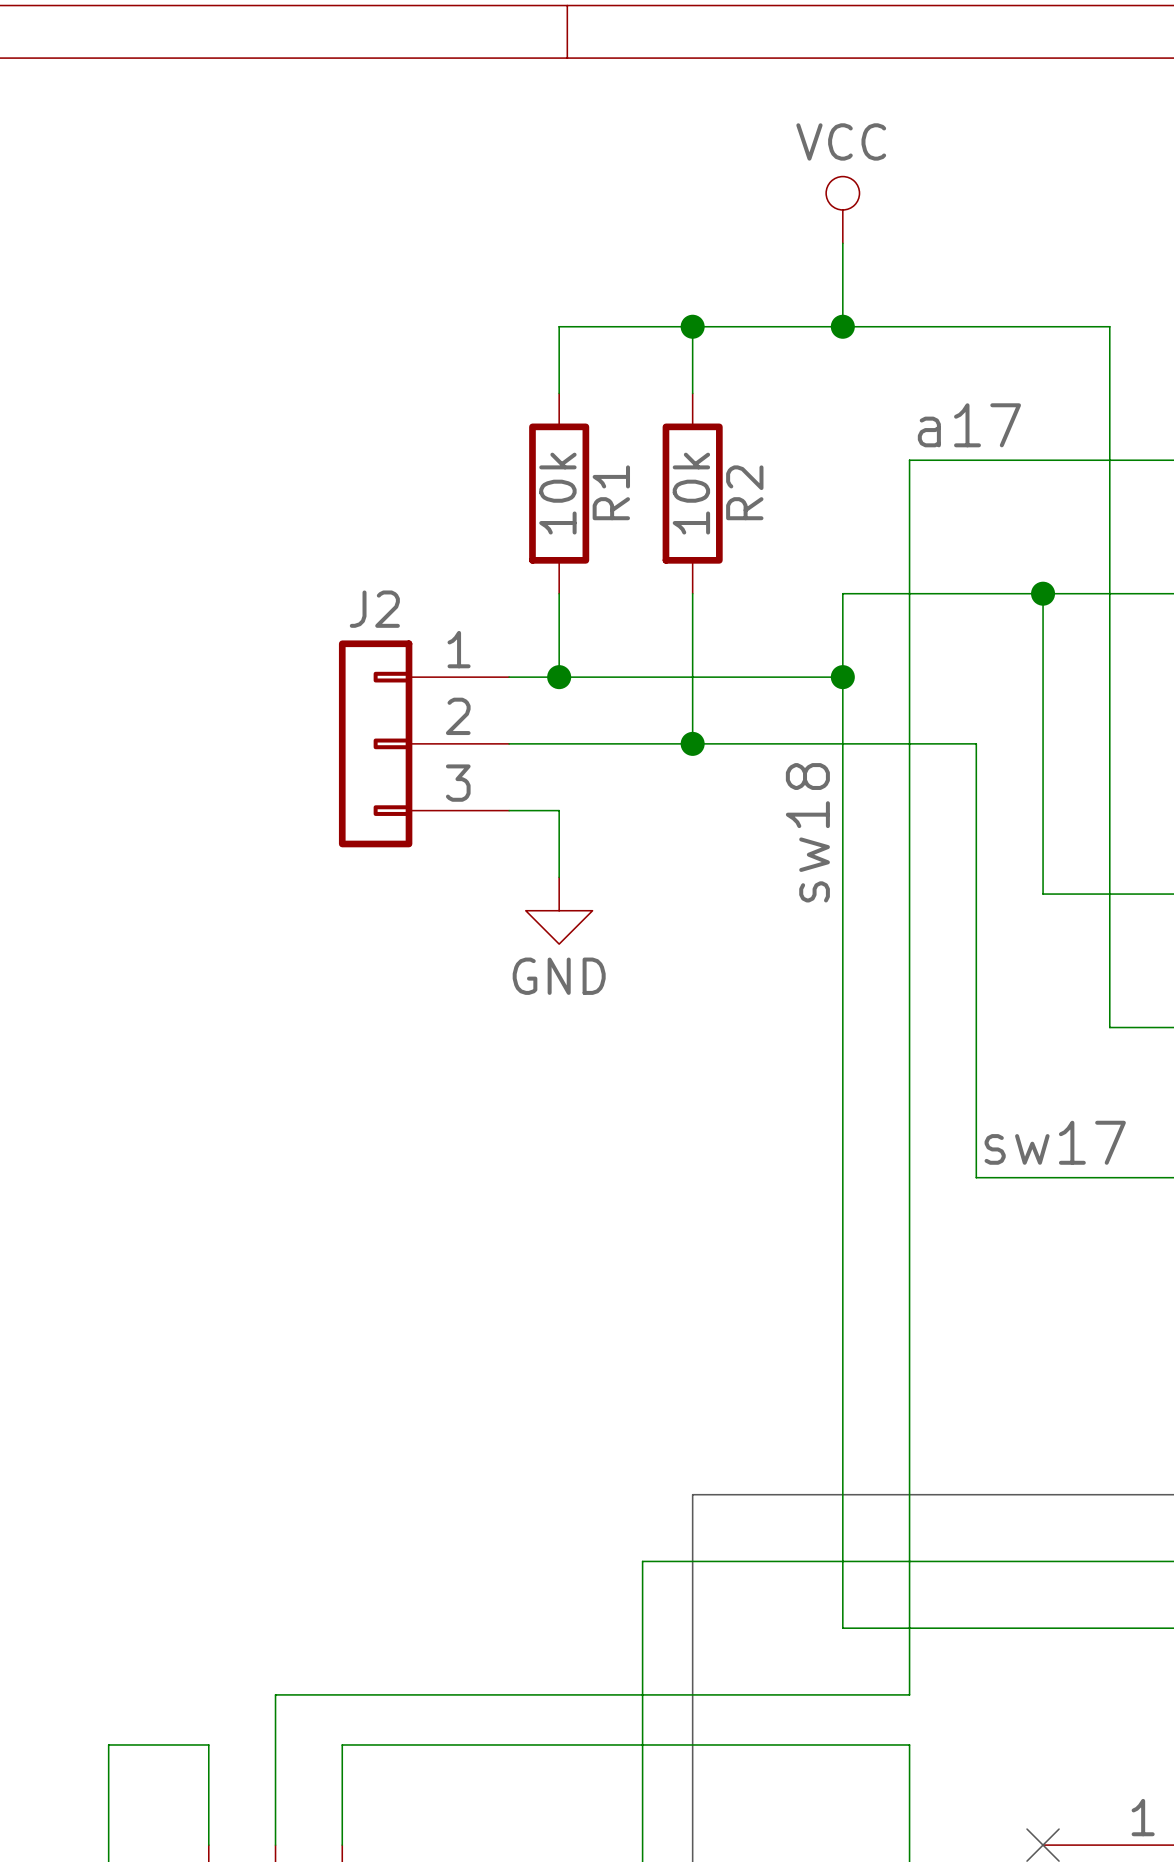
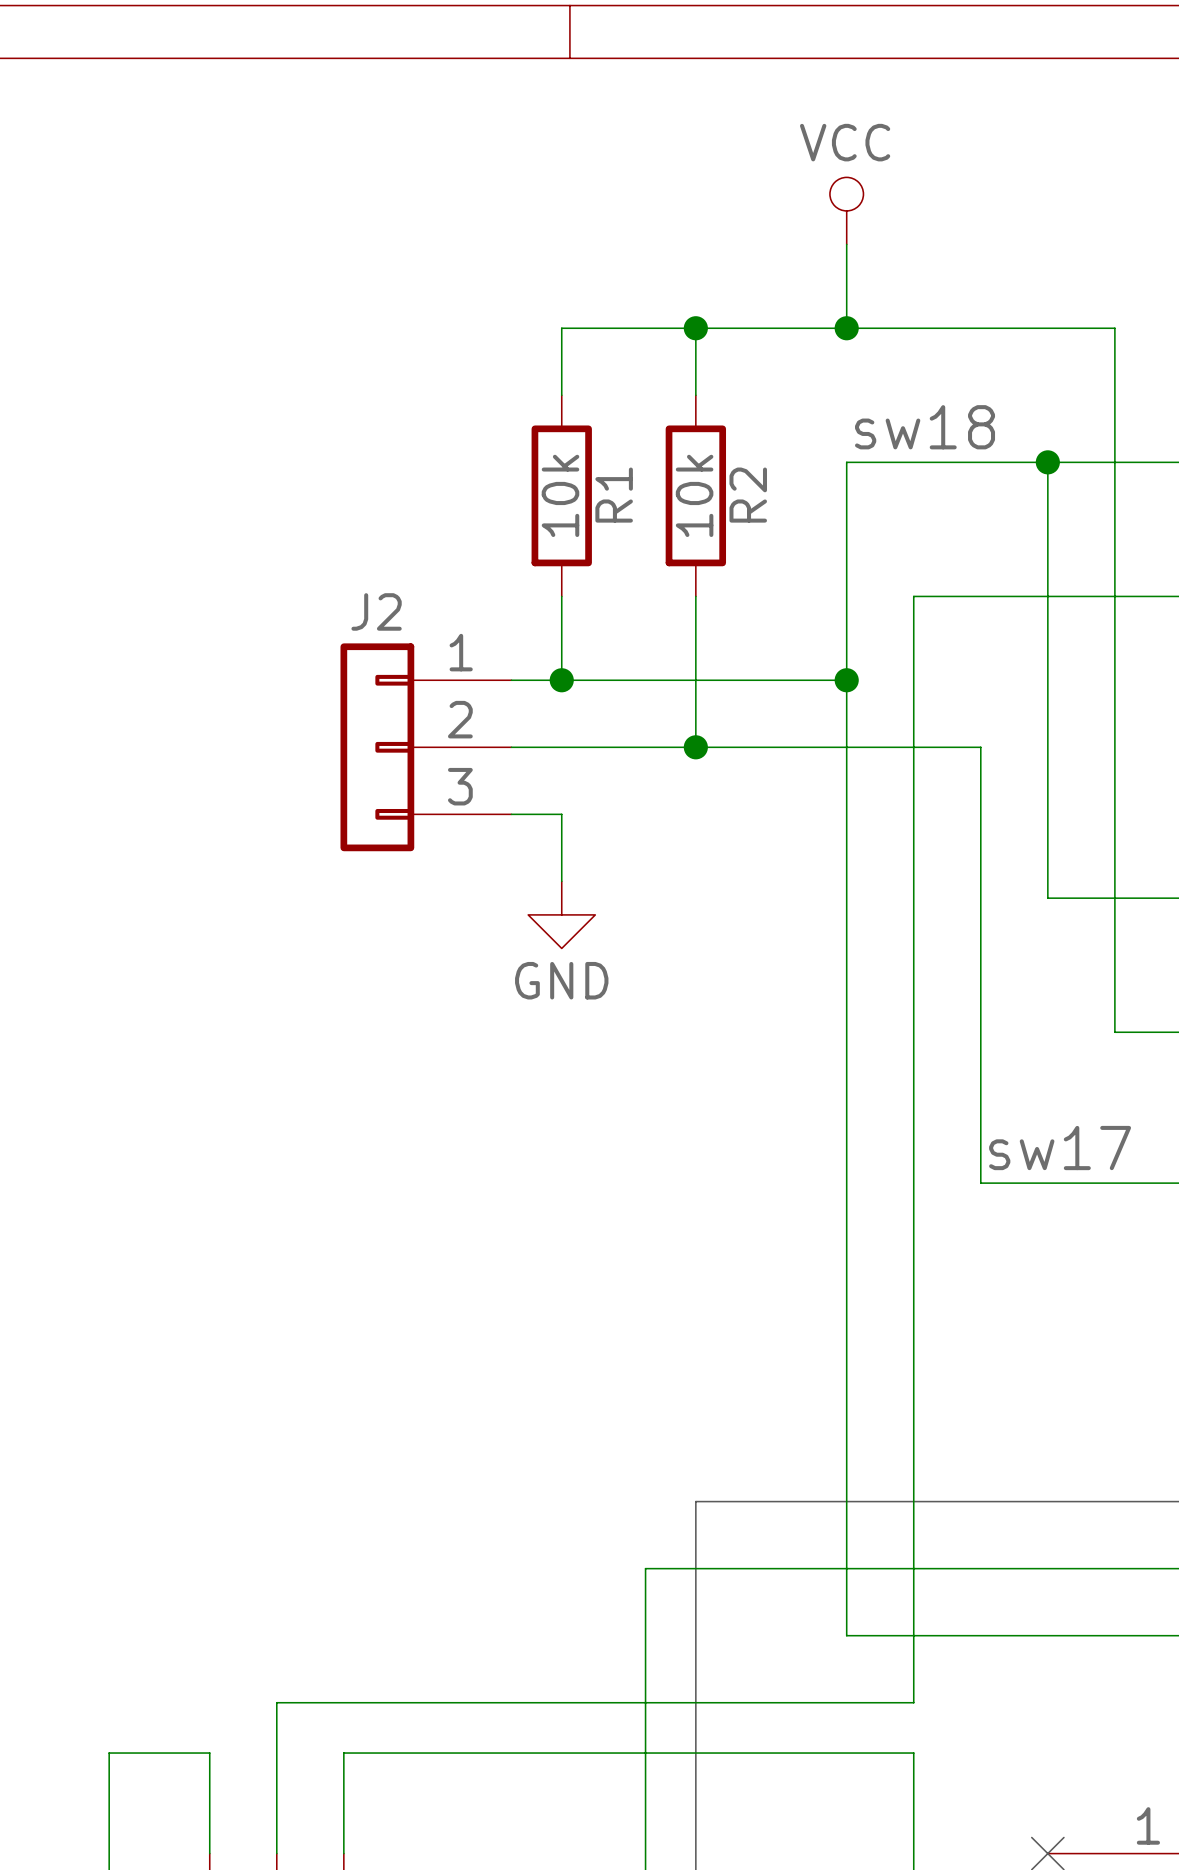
label: a17 (969, 425) -> none
wire: (909, 460) (909, 593) (842, 593) -> (913, 462) (846, 462) (846, 596)
wire: none -> (1047, 462) (1047, 596)
junction position: (1043, 593) -> (1047, 462)
label rotation: 0° (807, 832) -> 90° clockwise (925, 427)
label position: sw18 (807, 832) -> sw18 (925, 427)

